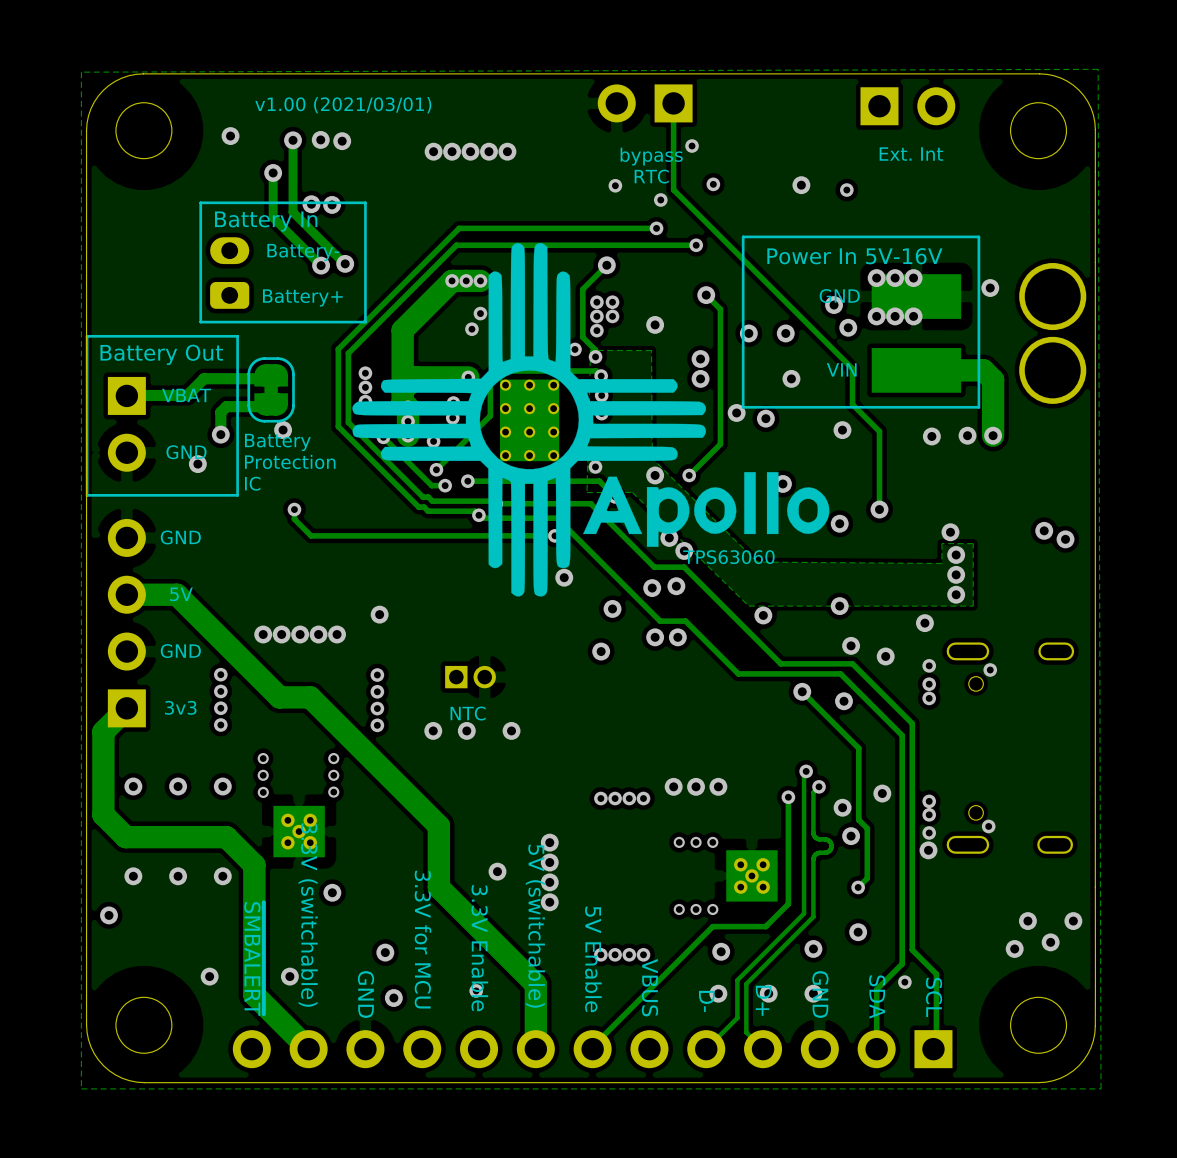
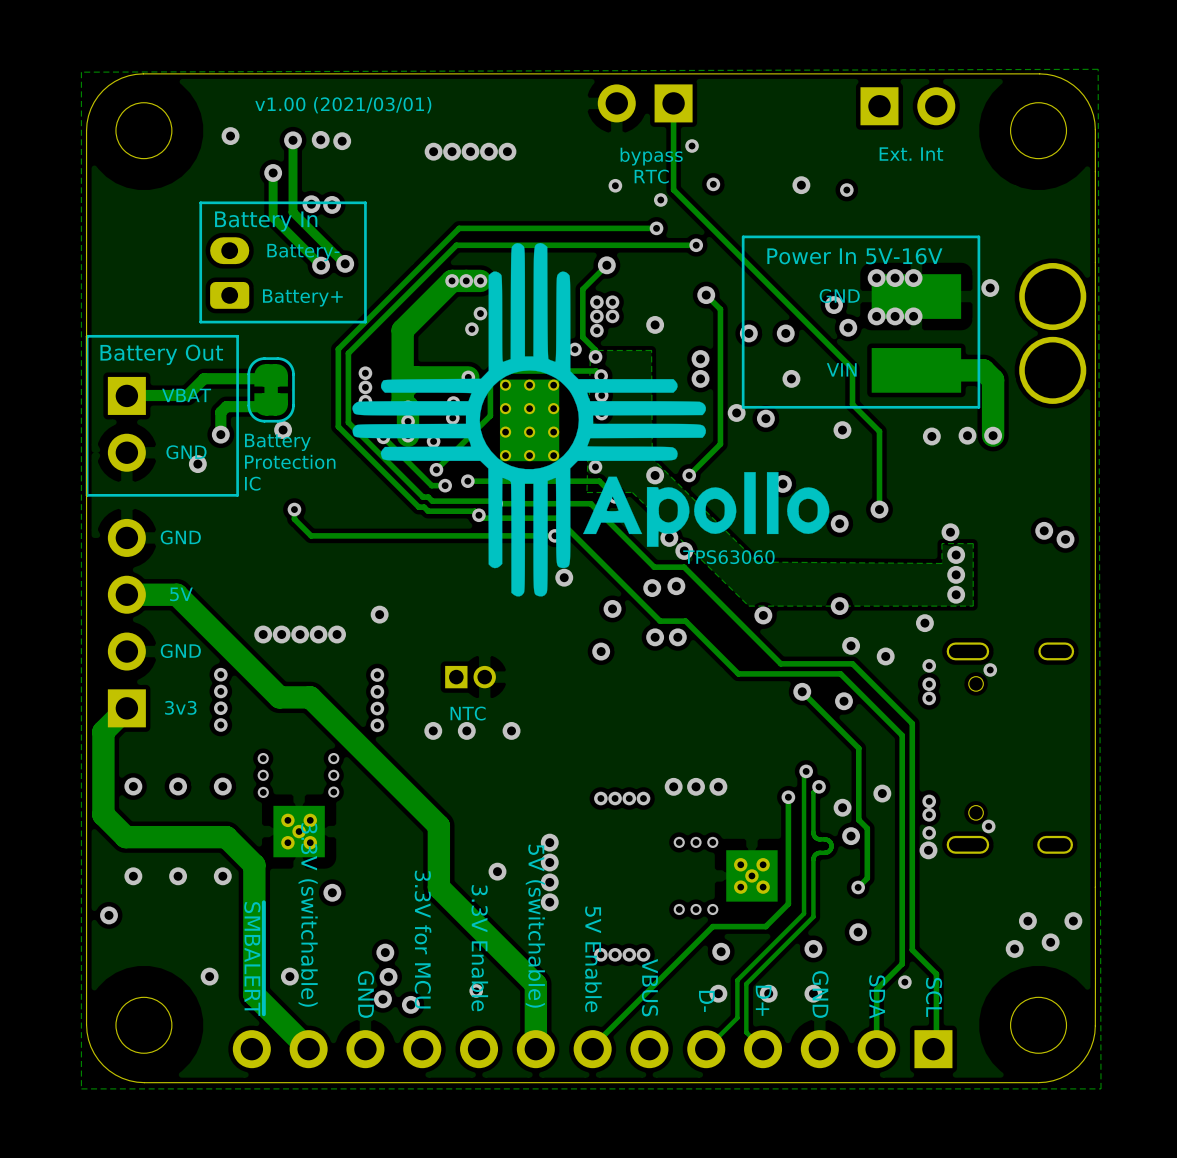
via: none -> (388, 976)
via: (393, 998) -> none
via: none -> (382, 999)
via: none -> (410, 1004)

